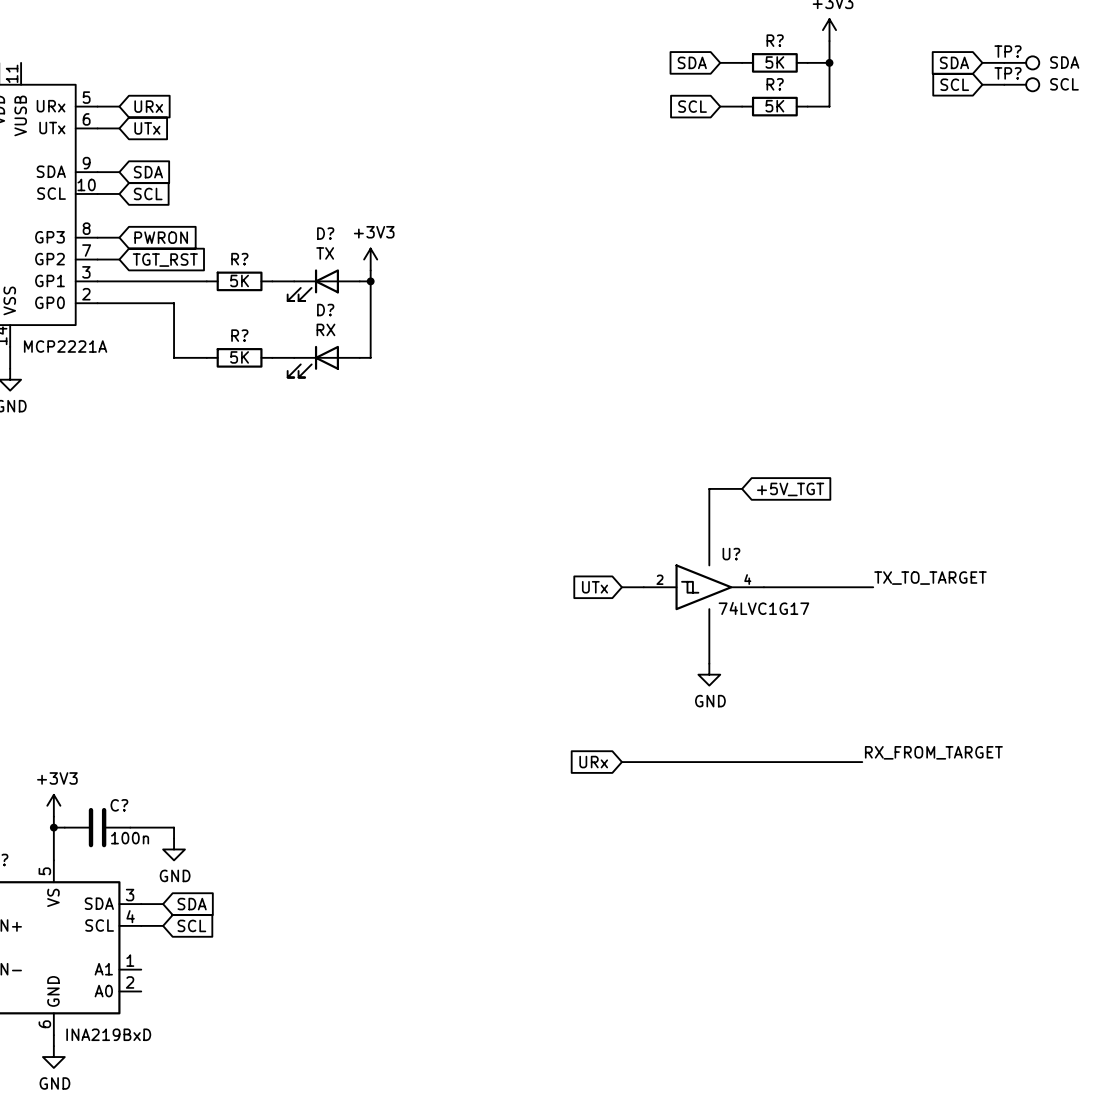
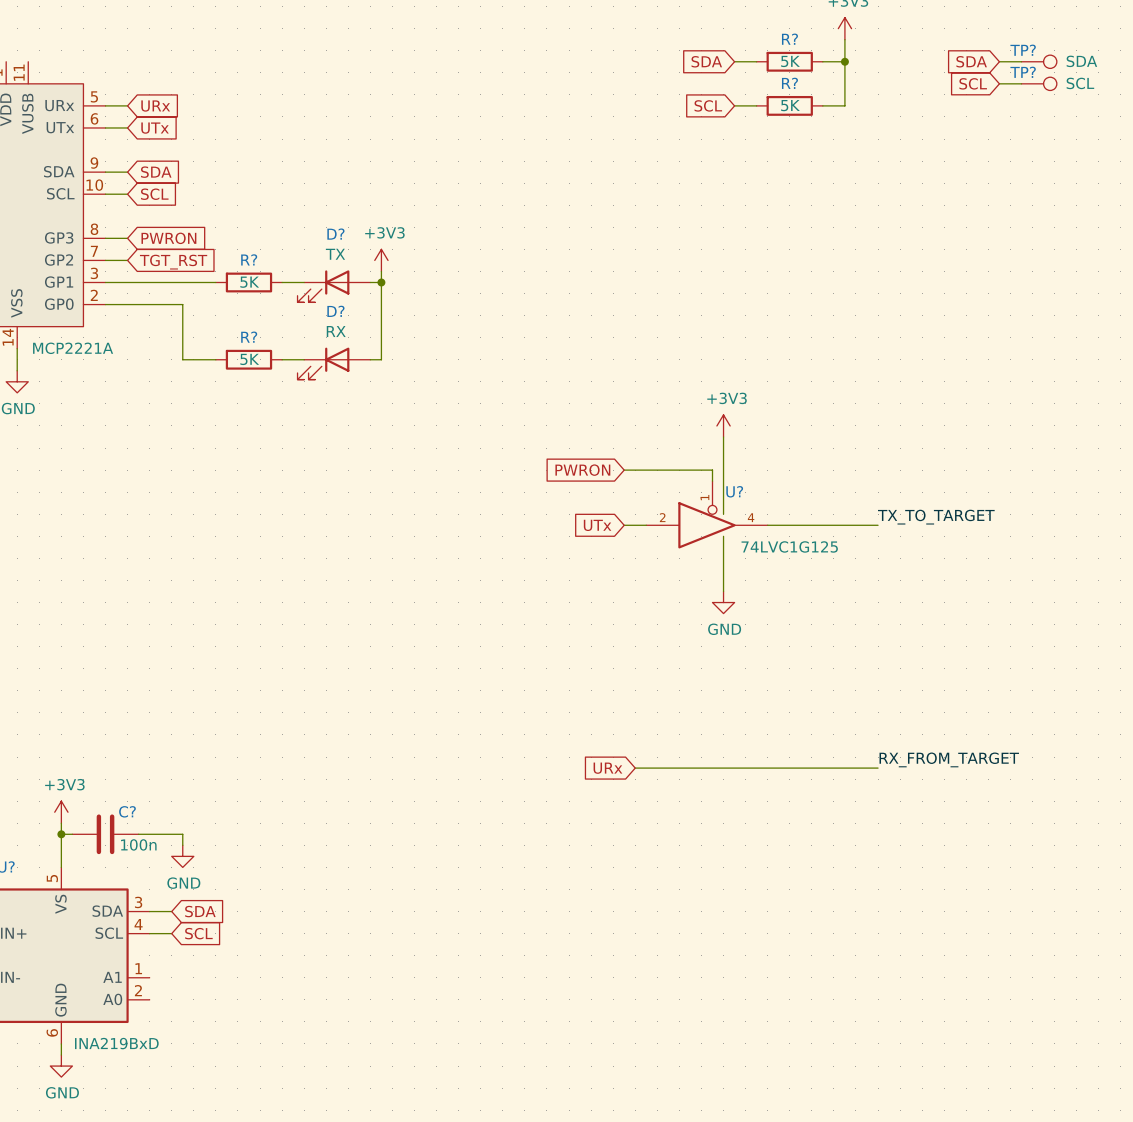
power symbol: none -> +3V3 (723, 425)
global label: none -> PWRON (582, 470)
wire: none -> (624, 470) (712, 470) (712, 481)
wire: (709, 488) (742, 488) -> (723, 492) (723, 437)
global label: +5V_TGT (790, 489) -> none
wire: (709, 510) (709, 532) -> (723, 569) (723, 591)
U?: none -> 74LVC1G125 (706, 514)
label position: TX_TO_TARGET (930, 578) -> TX_TO_TARGET (936, 517)
global label position: UTx (595, 587) -> UTx (597, 525)
wire: (621, 587) (643, 587) -> (624, 525) (646, 525)
U?: 74LVC1G17 (703, 587) -> none
wire: (763, 587) (873, 587) -> (767, 525) (878, 525)
wire: (709, 609) (709, 663) -> none
power symbol position: GND (709, 674) -> GND (723, 602)

